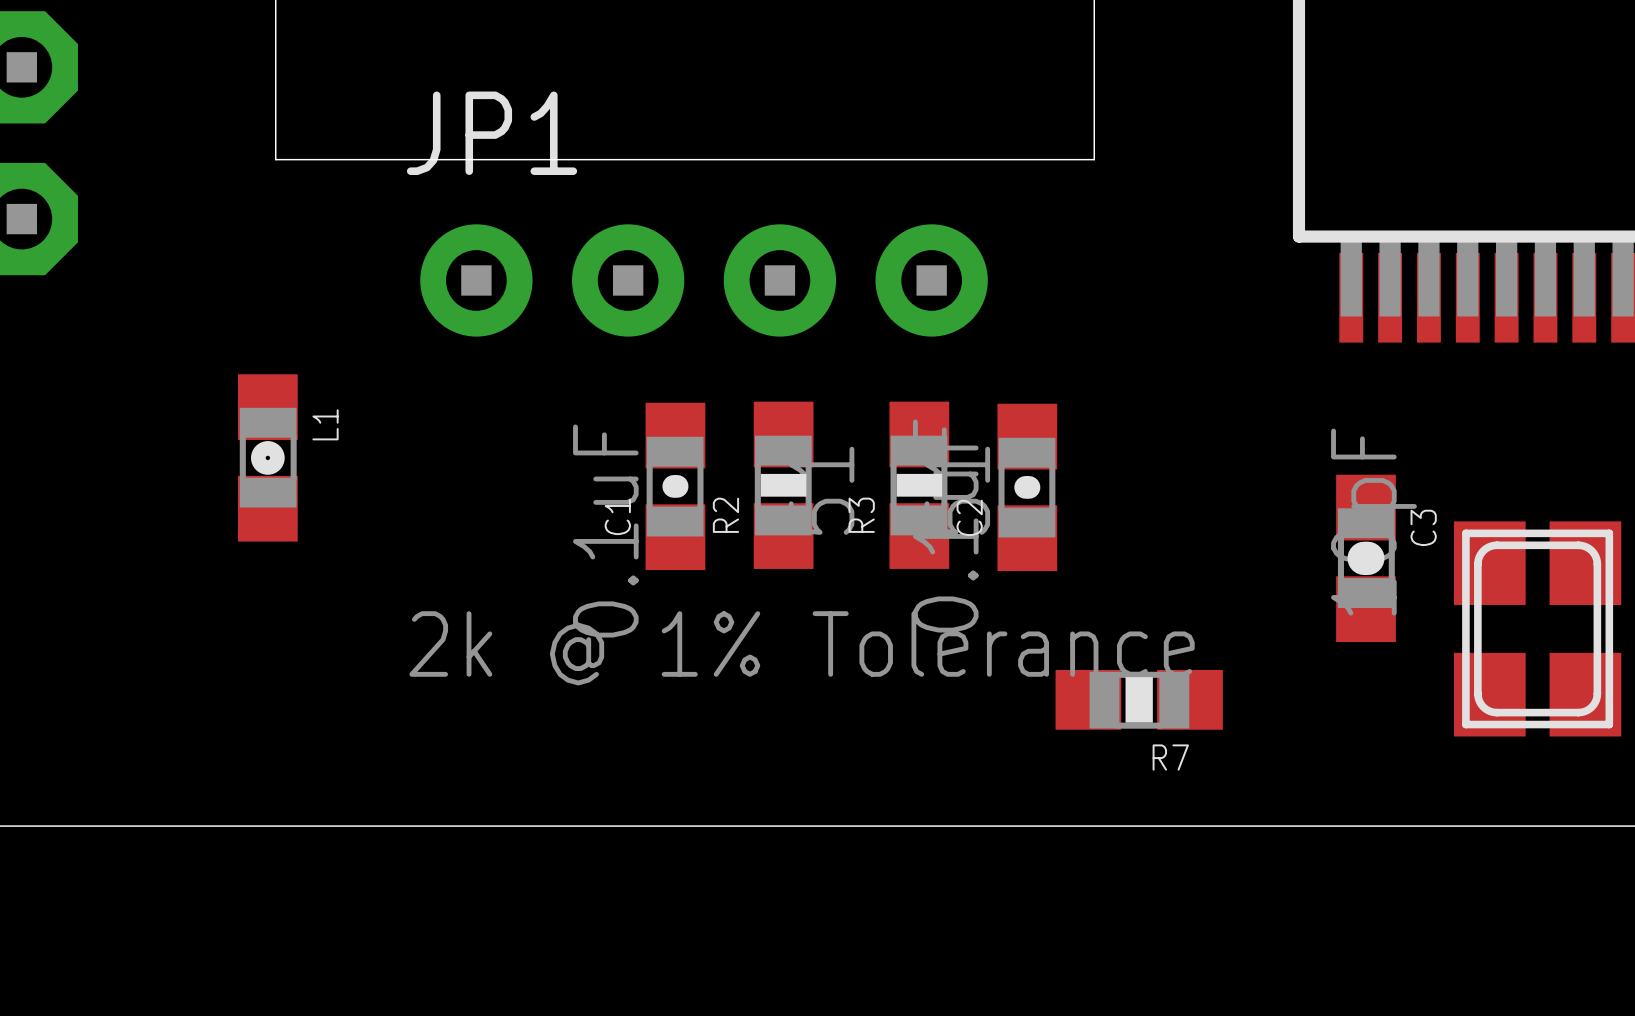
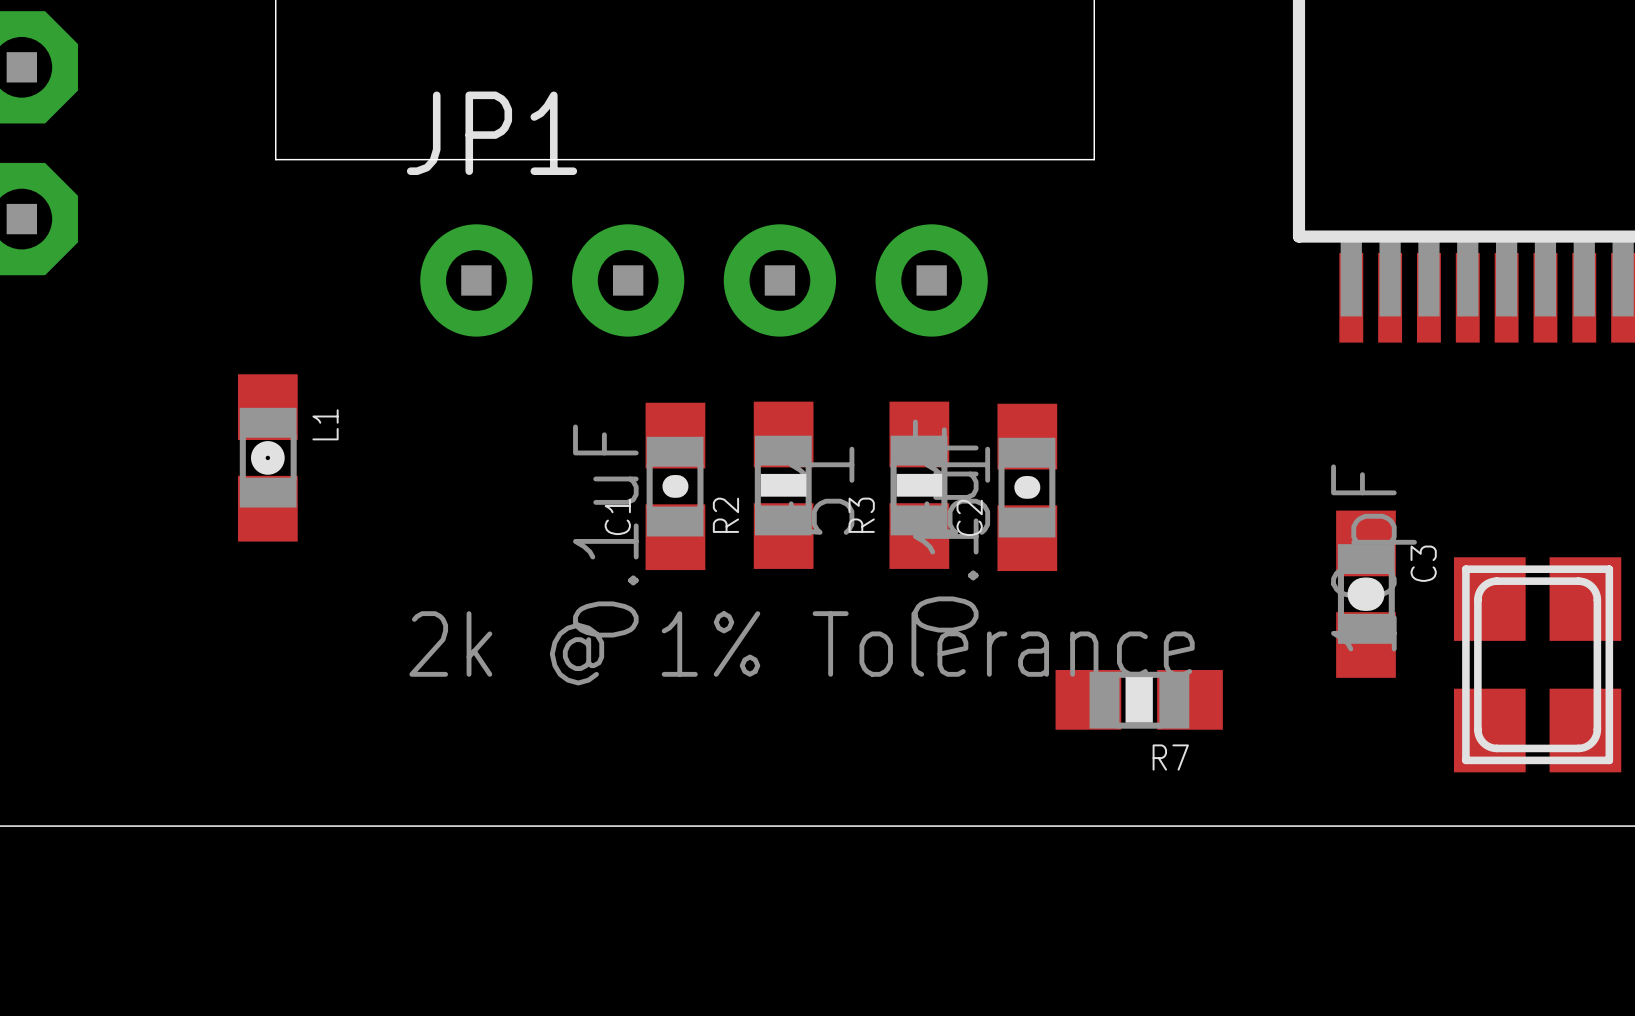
C3 position: (1365, 558) -> (1365, 594)
part position: (1537, 628) -> (1537, 664)

